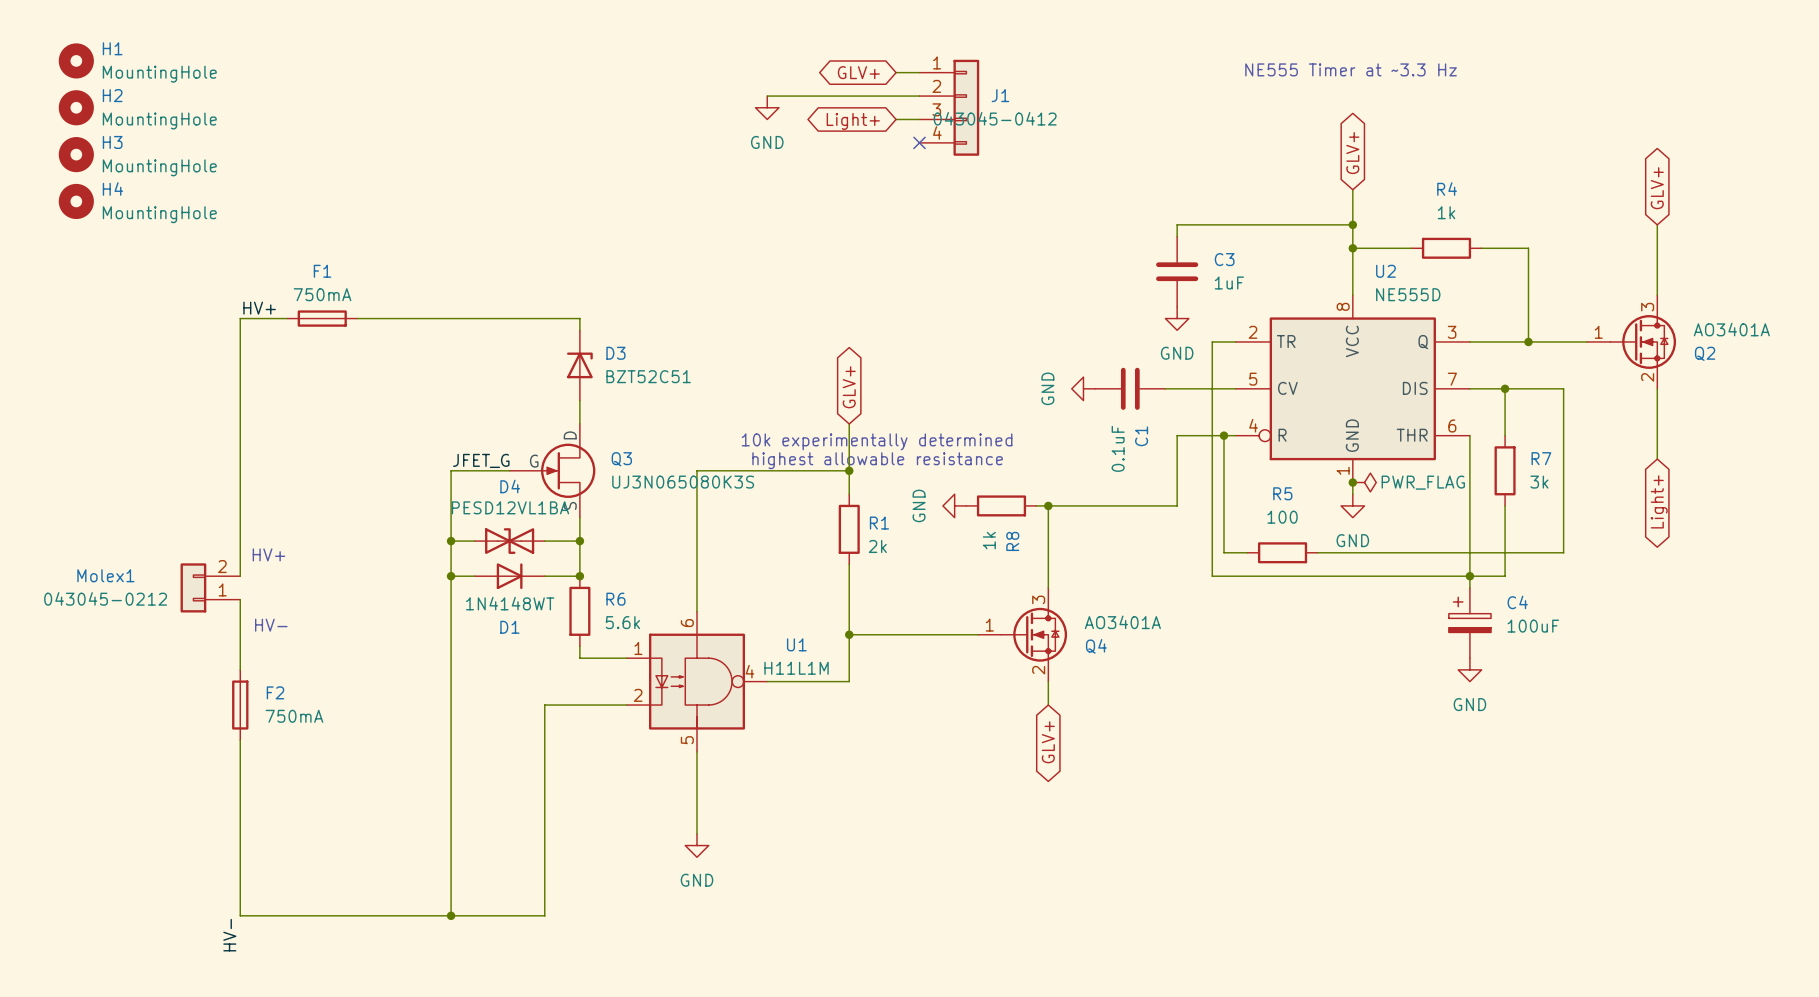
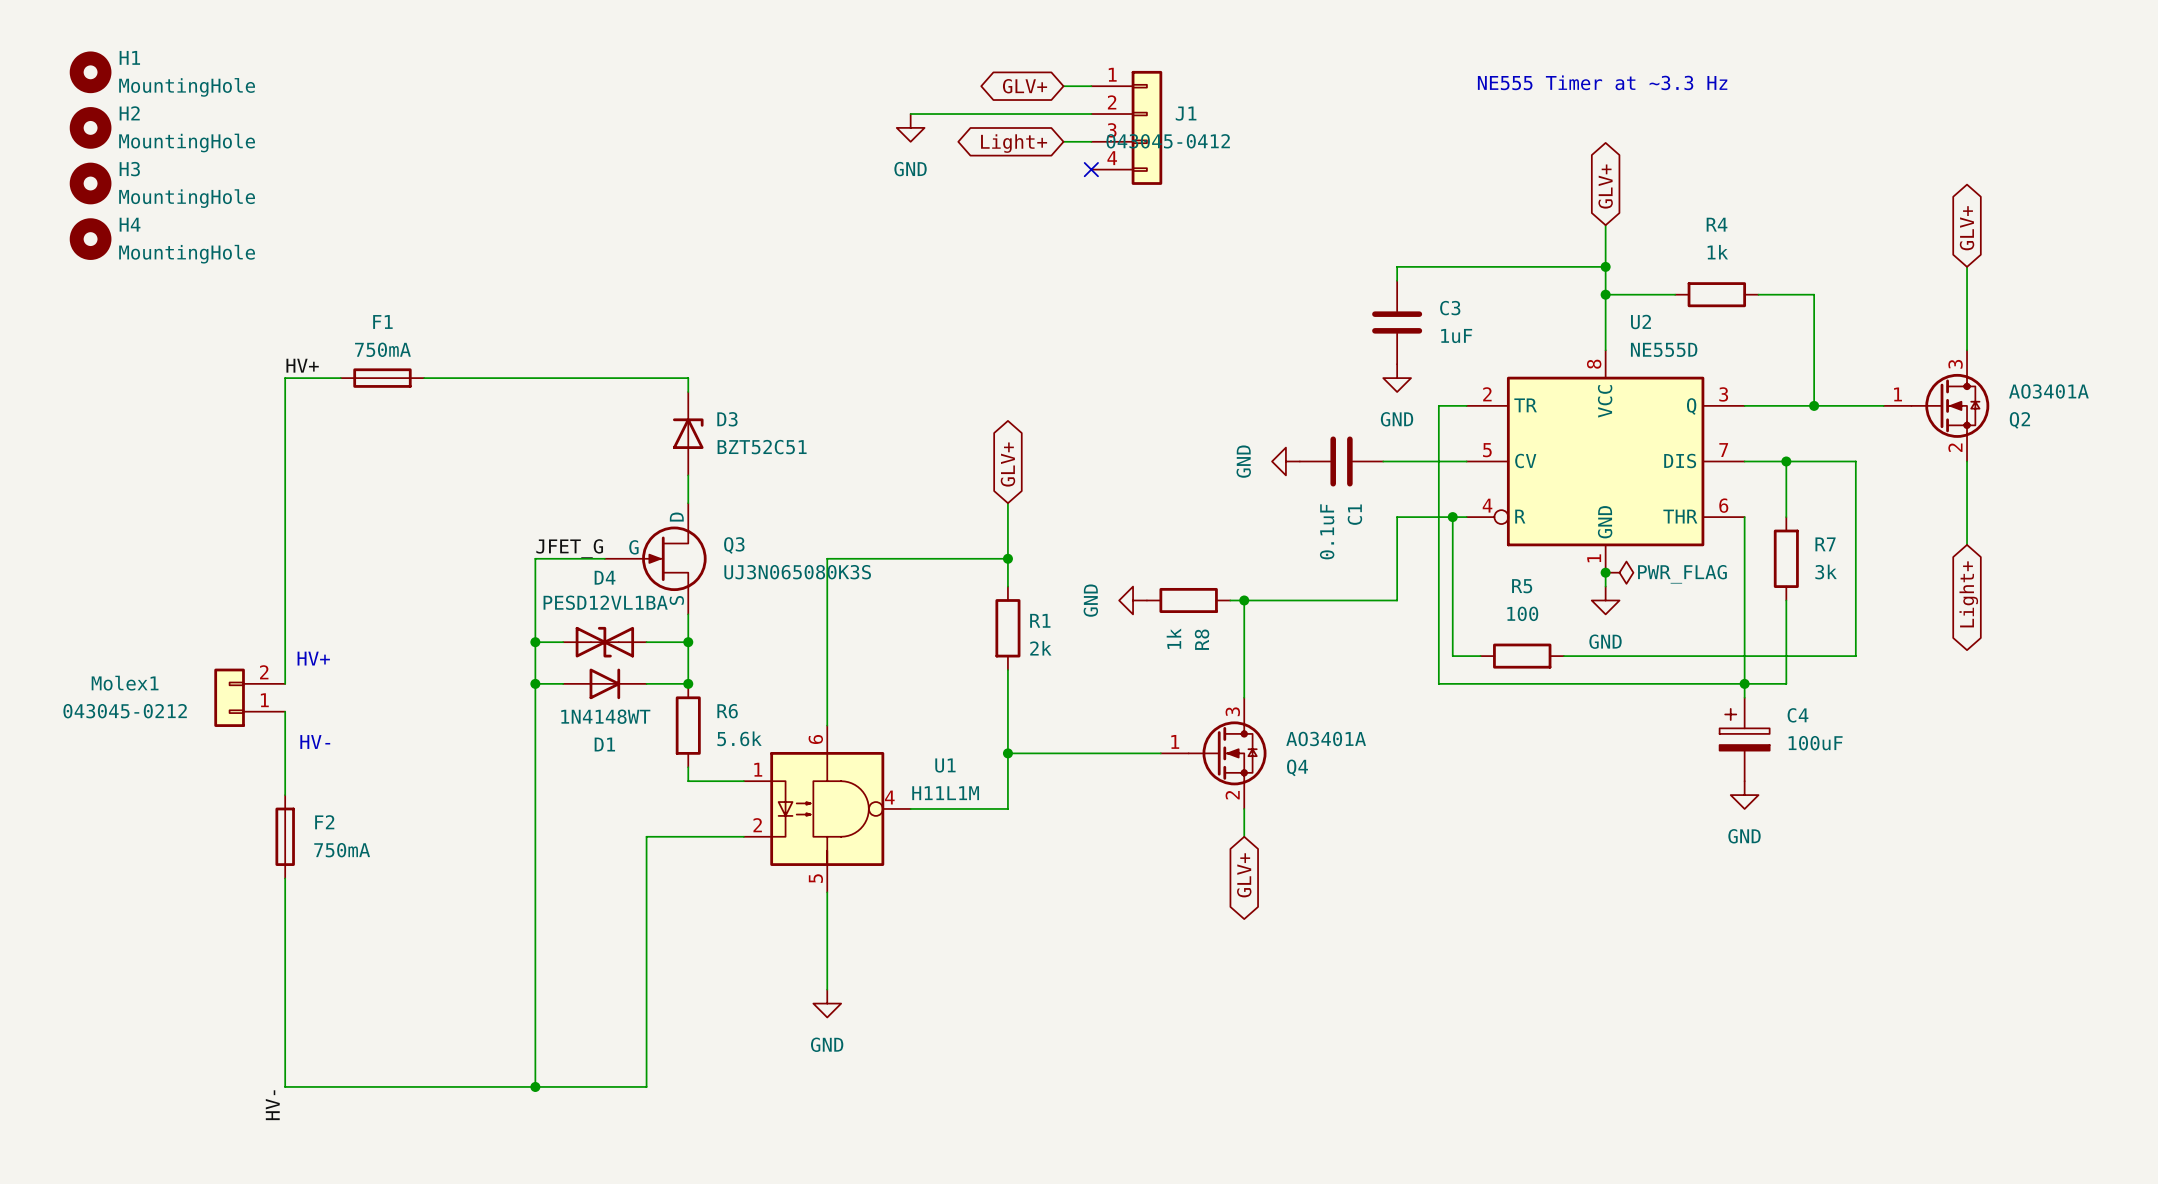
text: 10k experimentally determined (877, 441) -> none
text: highest allowable resistance (877, 460) -> none

